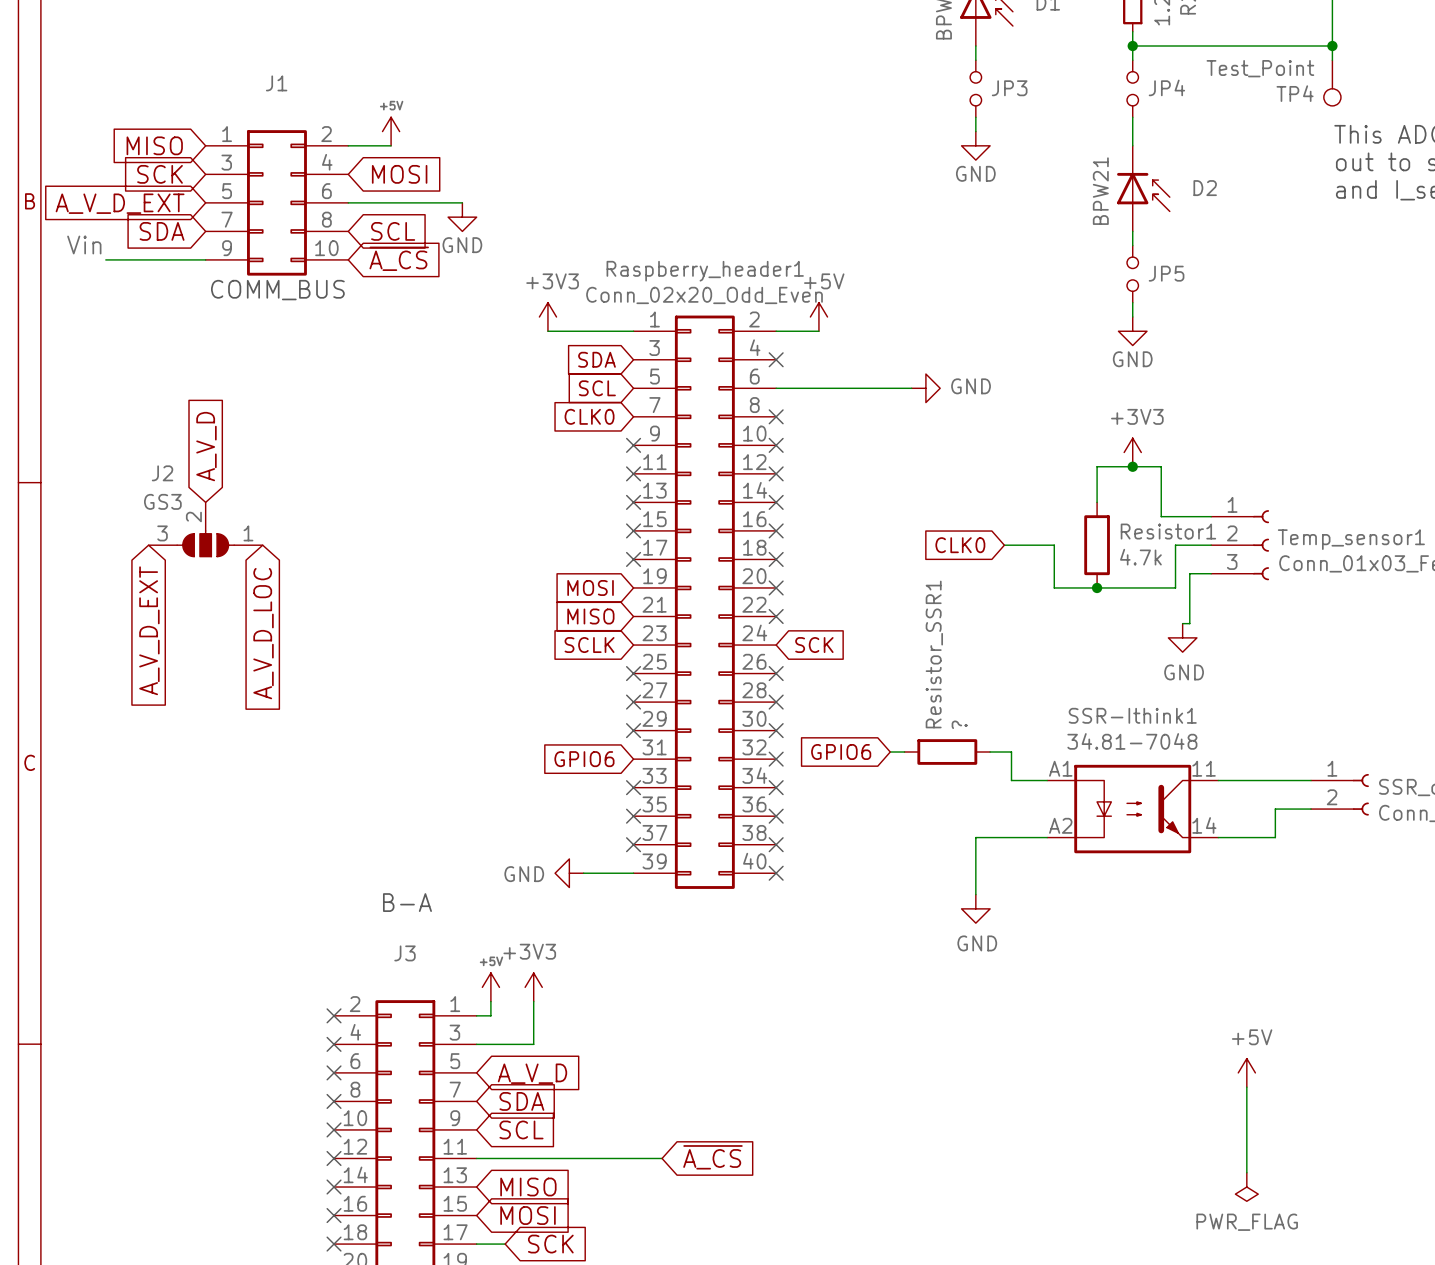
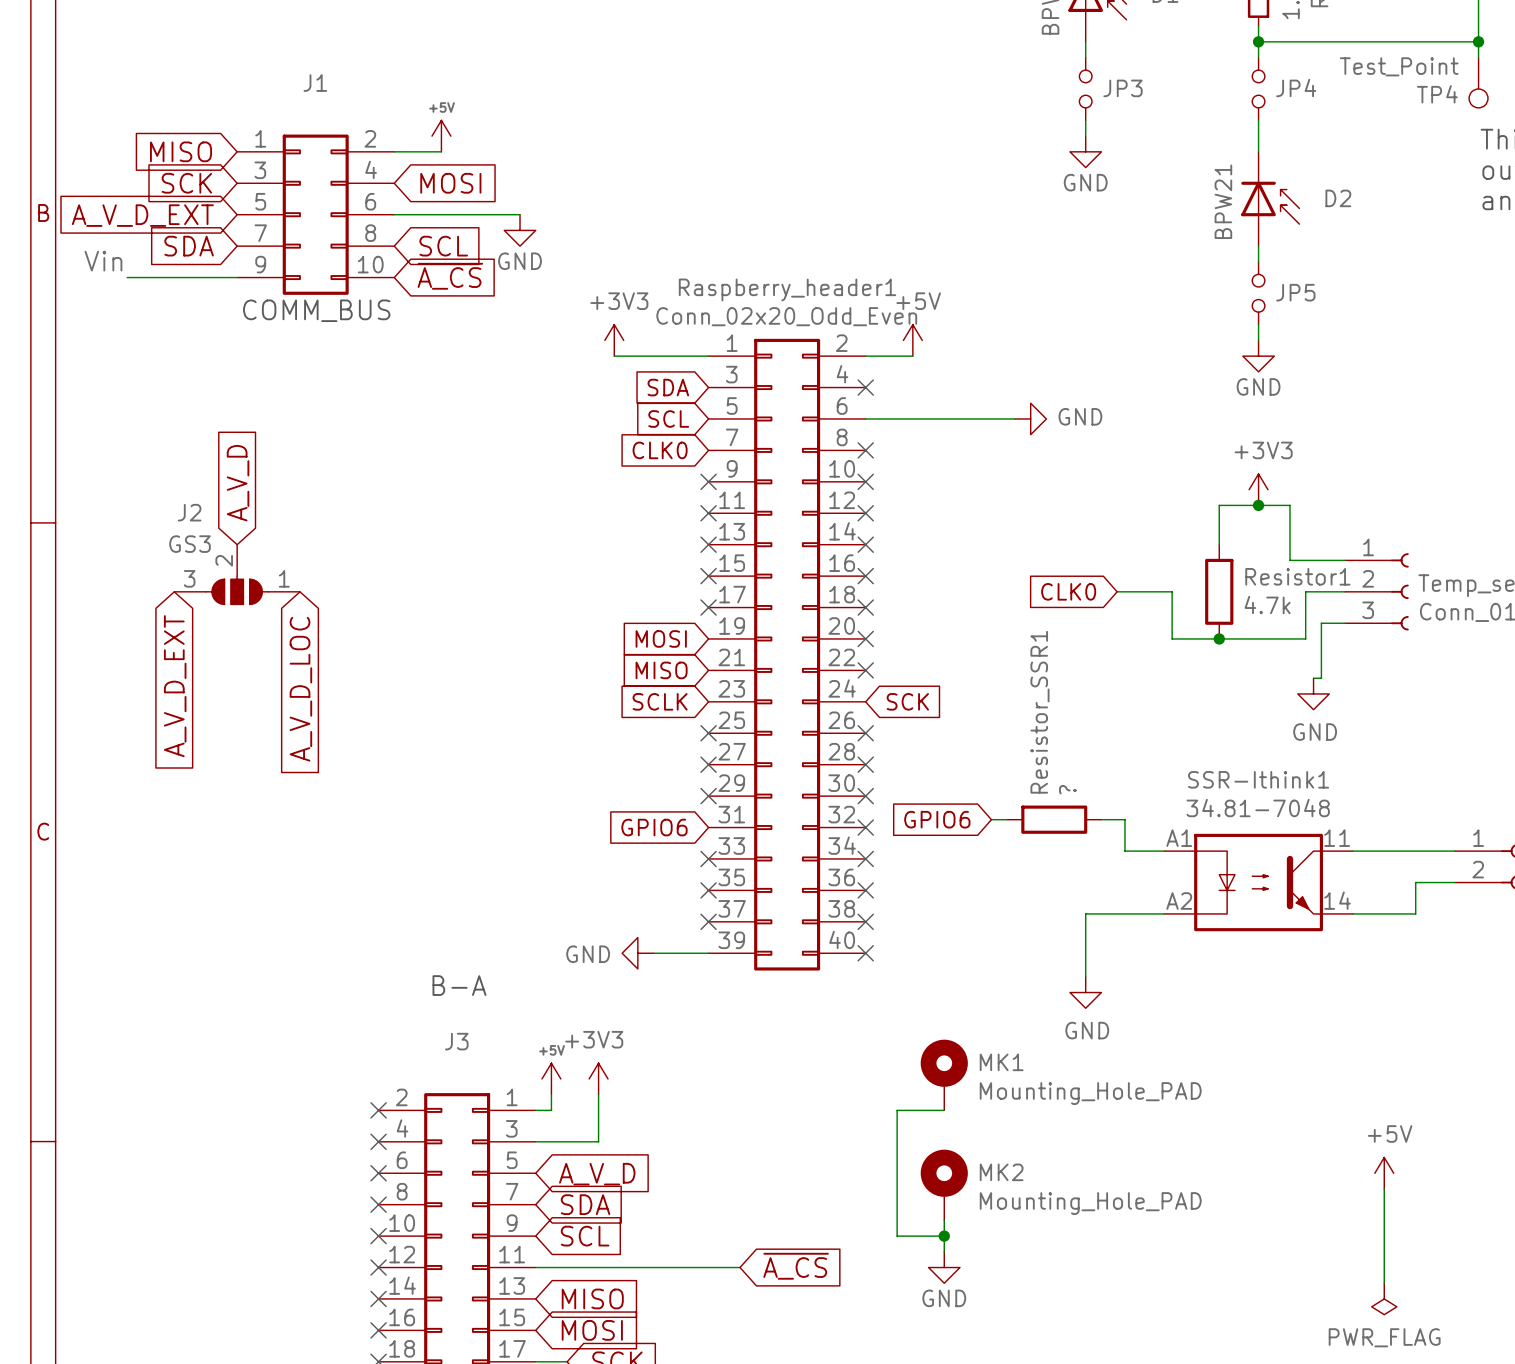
MK1: none -> Mounting_Hole_PAD (944, 1075)
wire: none -> (944, 1110) (897, 1110) (897, 1236) (944, 1236)
MK2: none -> Mounting_Hole_PAD (944, 1185)
wire: none -> (944, 1220) (944, 1251)
junction: none -> (944, 1236)
power symbol: none -> GND (944, 1267)

